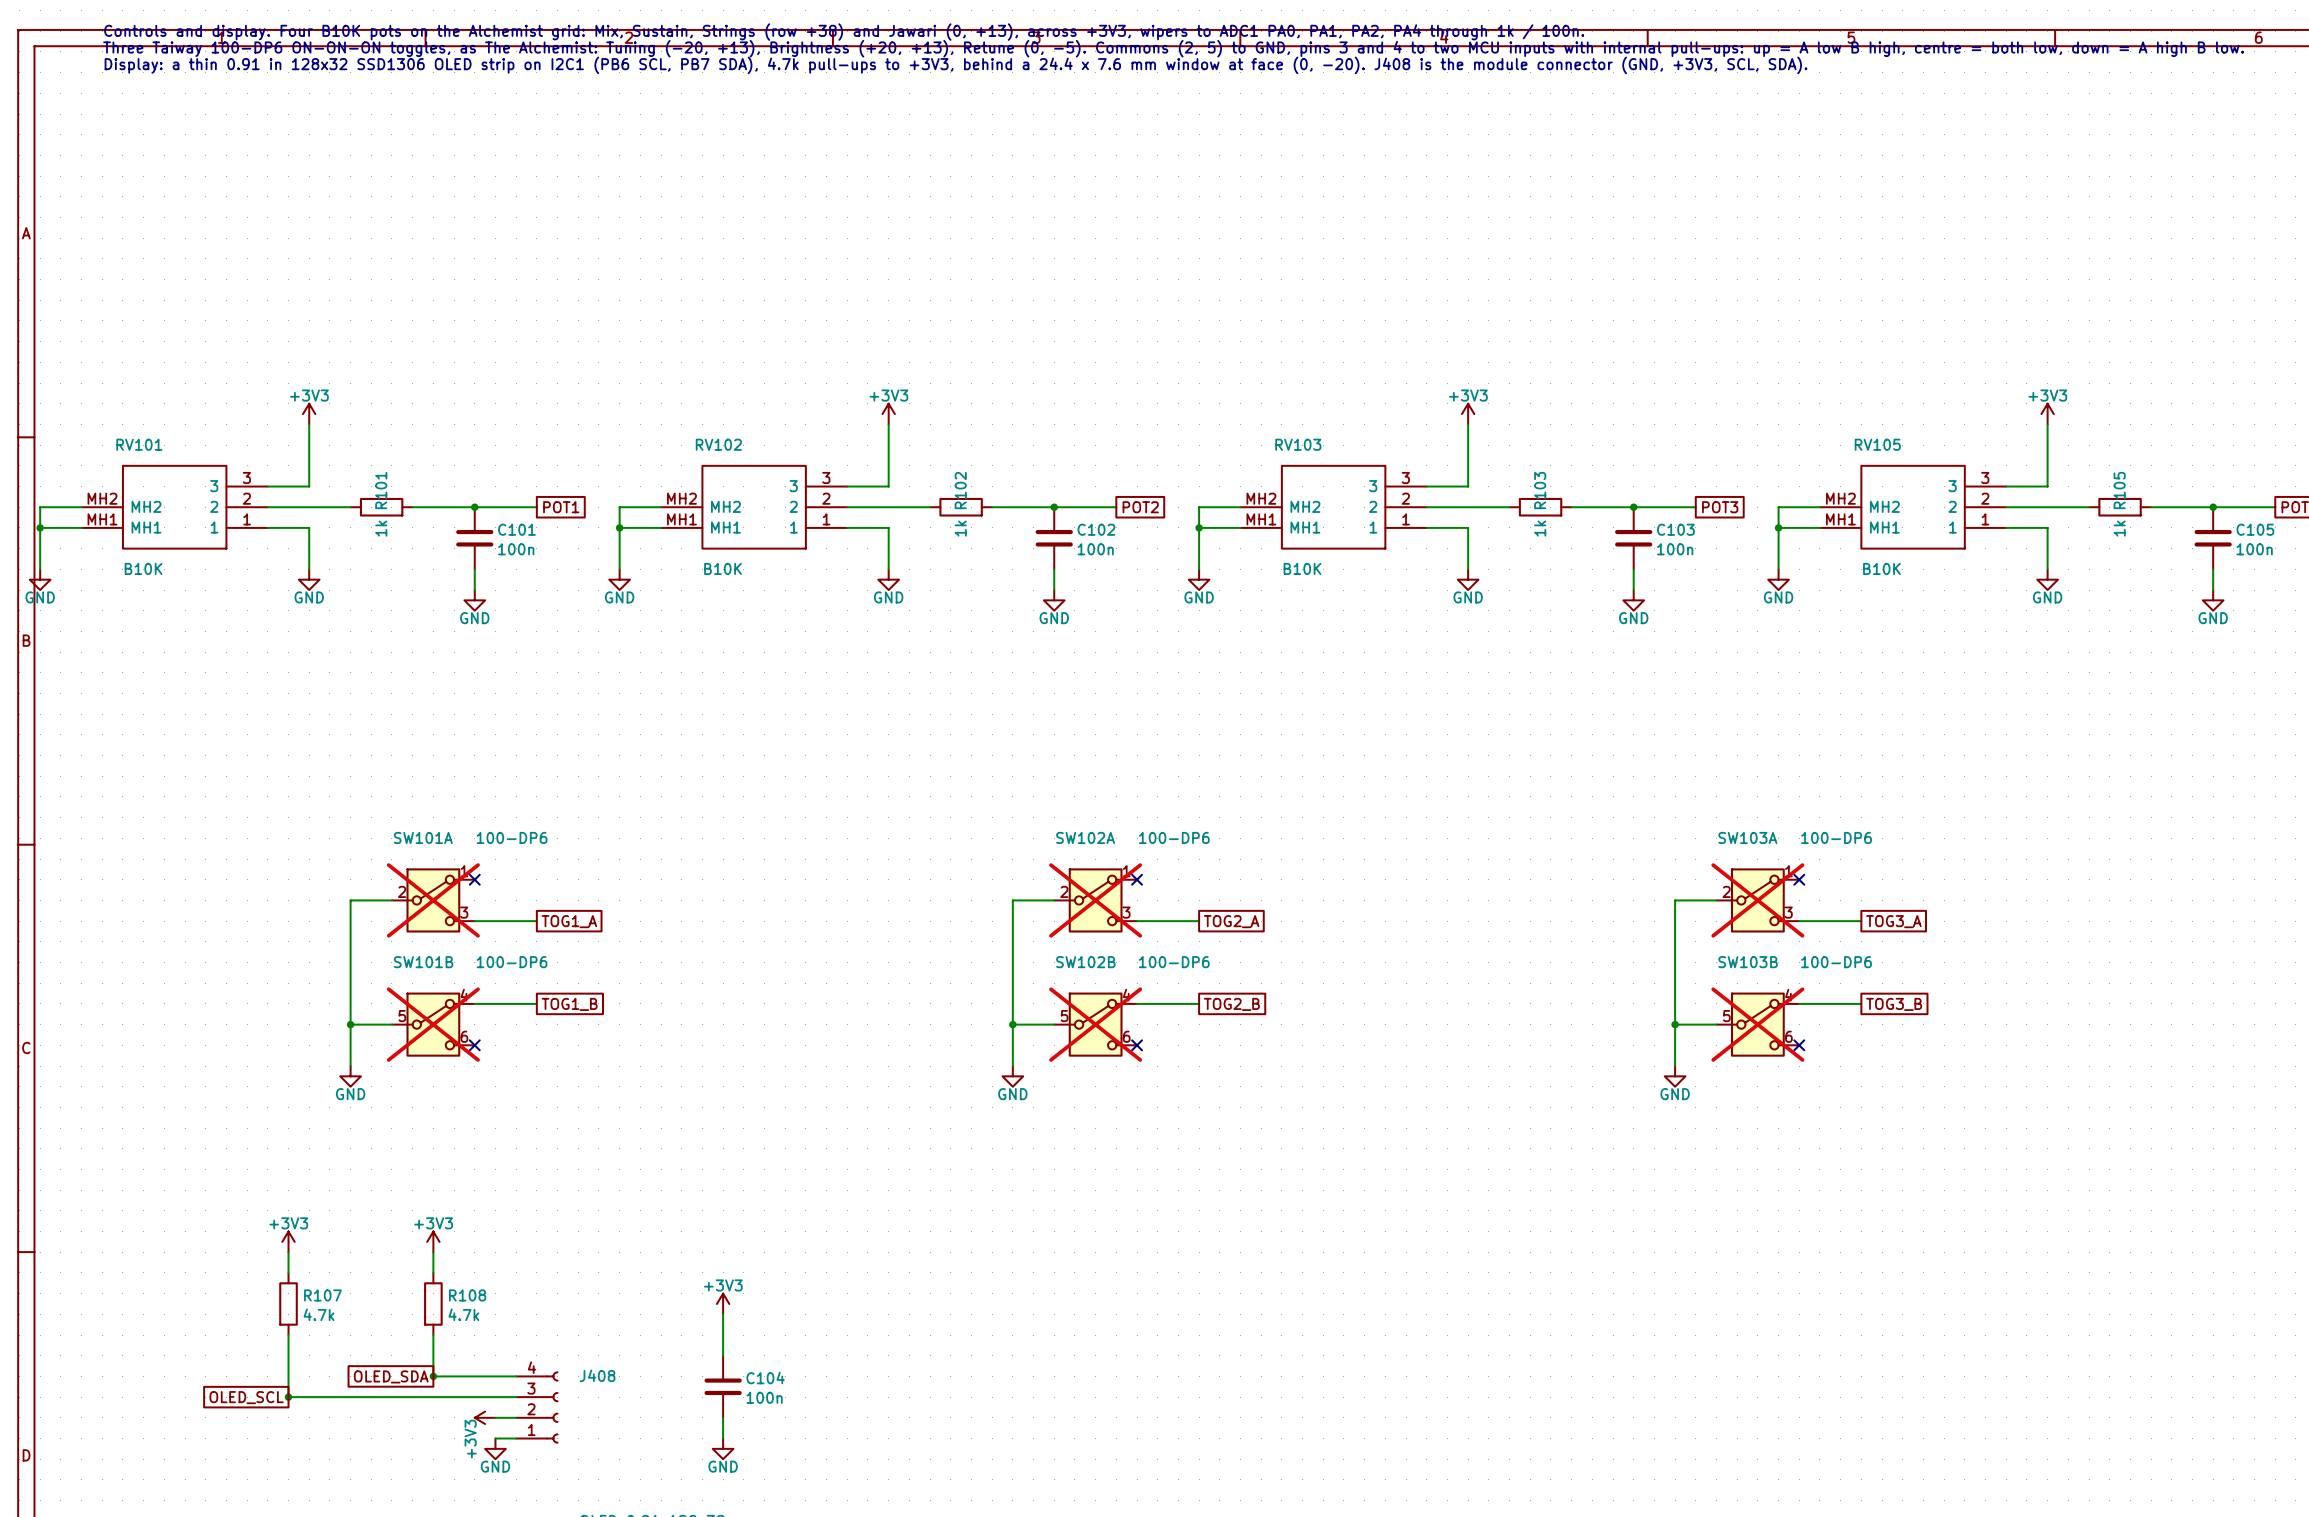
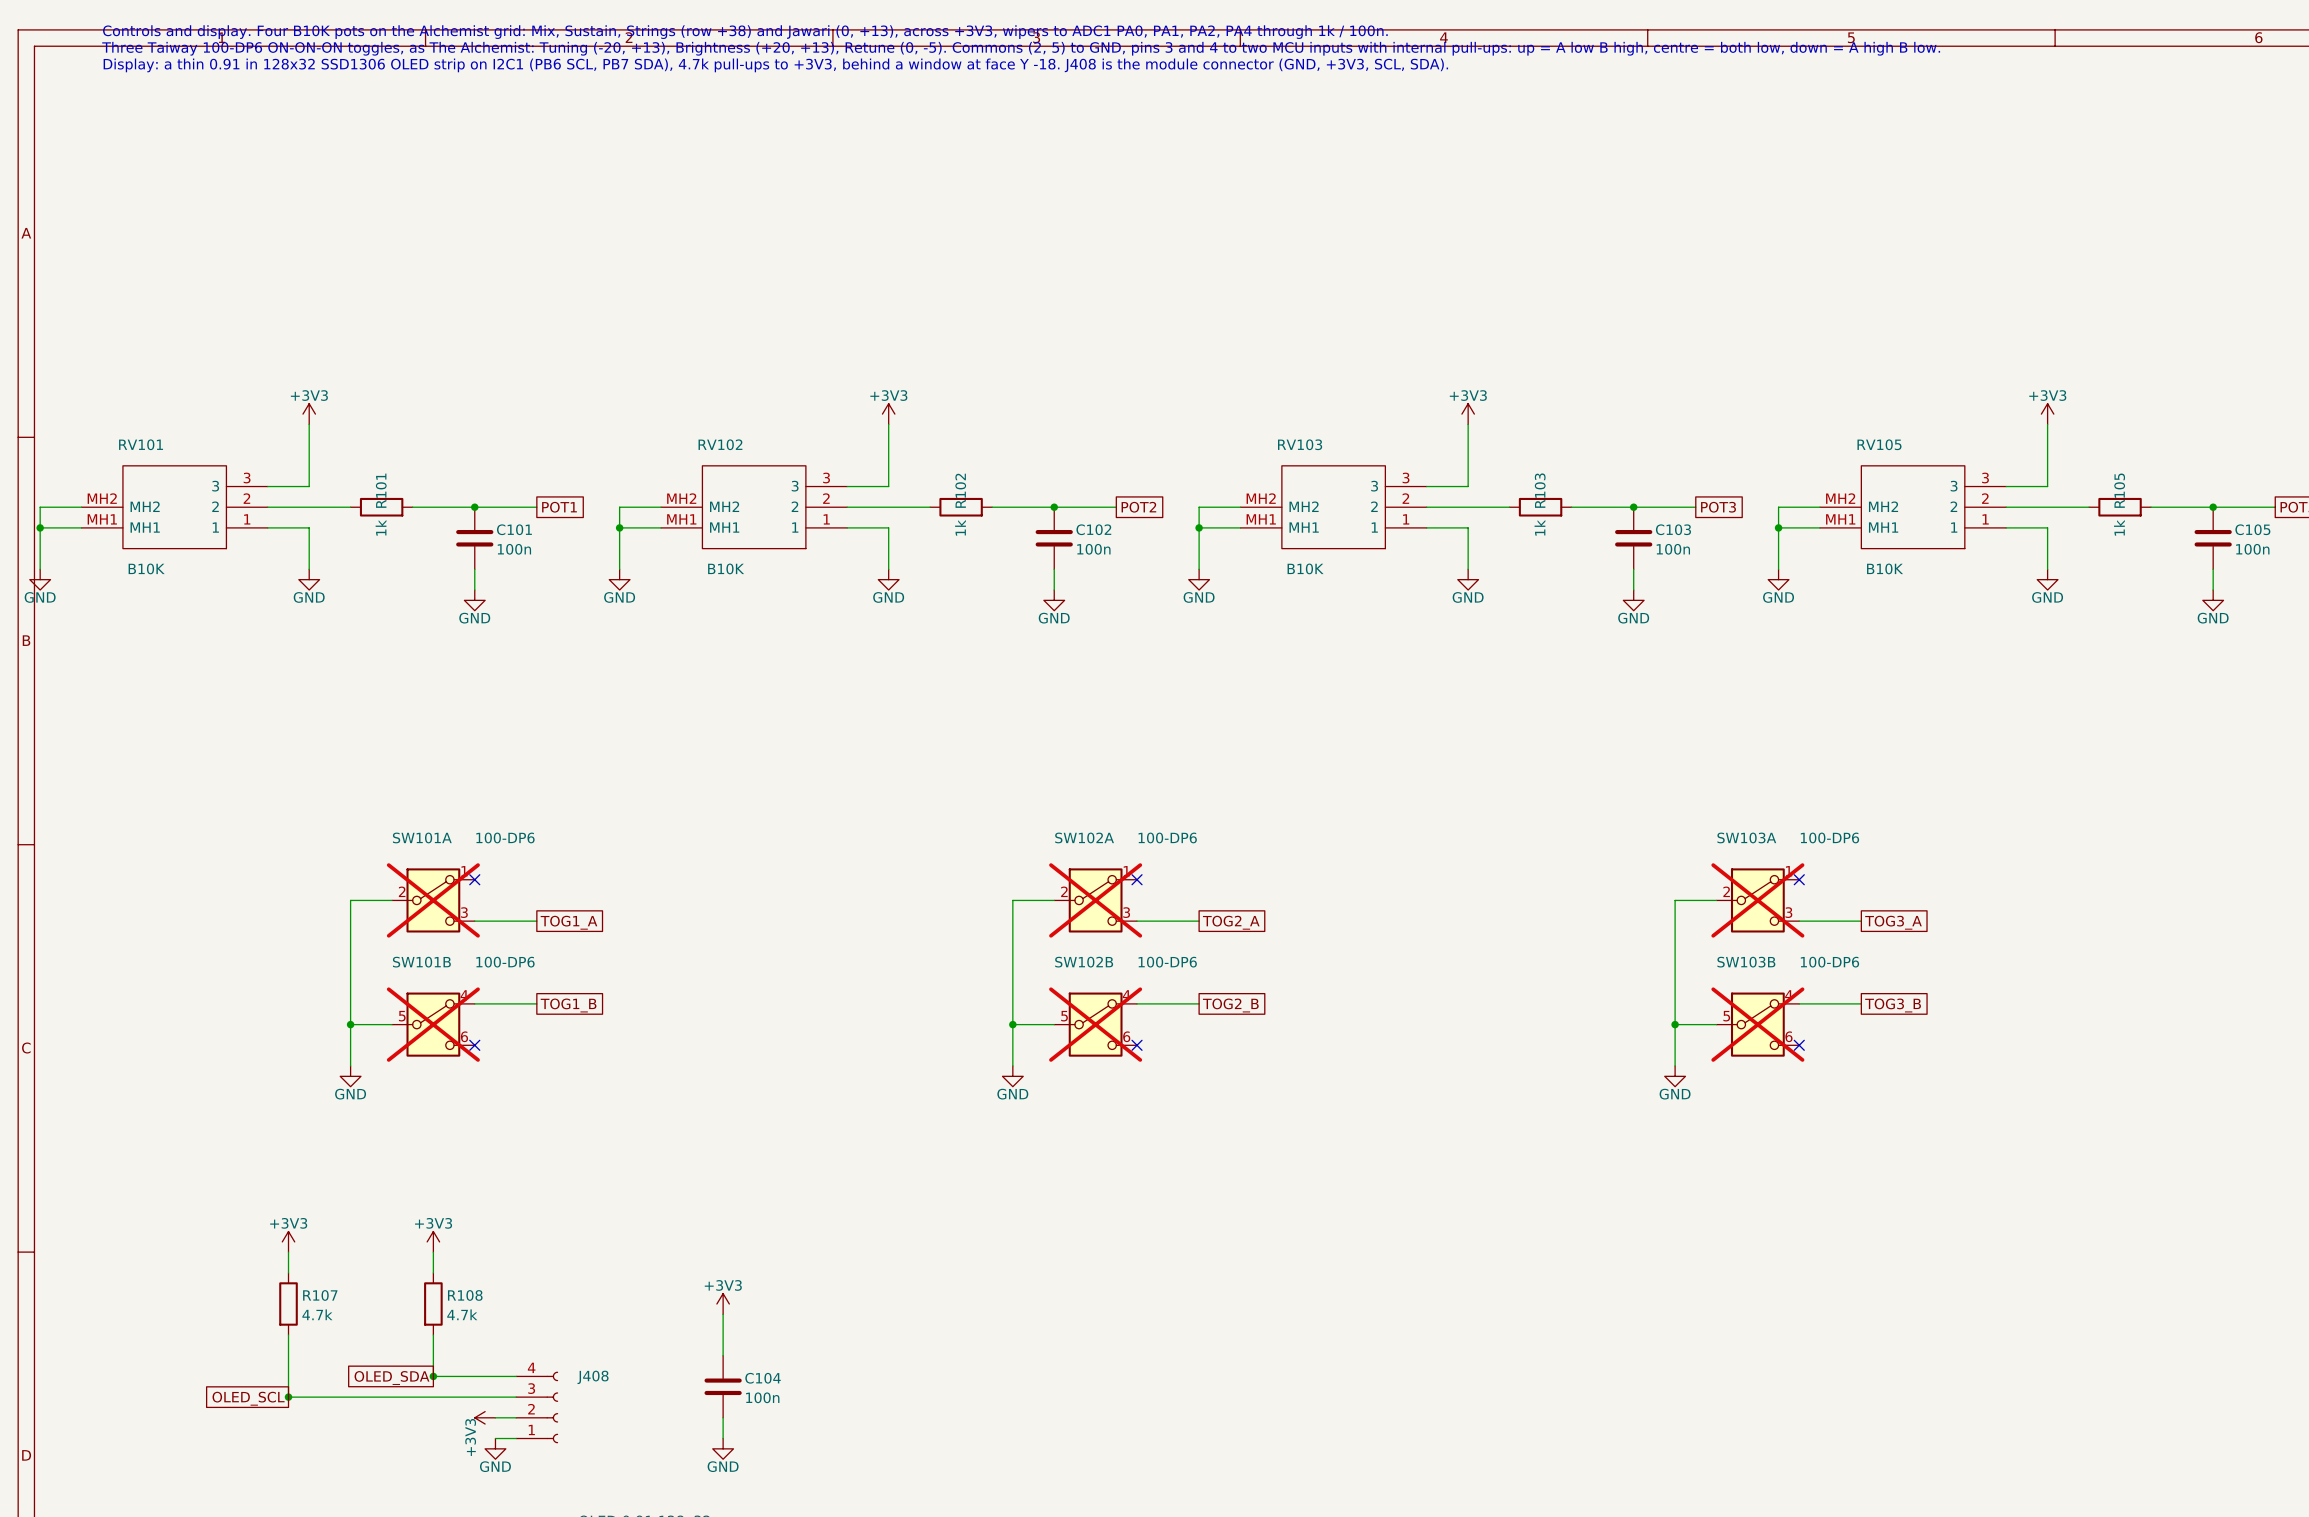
text: Display: a thin 0.91 in 128x32 SSD1306 OLED strip on I2C1 (PB6 SCL, PB7 SDA), 4.7k pull-ups to +3V3, behind a 24.4 x 7.6 mm window at face (0, -20). J408 is the module connector (GND, +3V3, SCL, SDA). (956, 65) -> Display: a thin 0.91 in 128x32 SSD1306 OLED strip on I2C1 (PB6 SCL, PB7 SDA), 4.7k pull-ups to +3V3, behind a window at face Y -18. J408 is the module connector (GND, +3V3, SCL, SDA). (775, 65)

